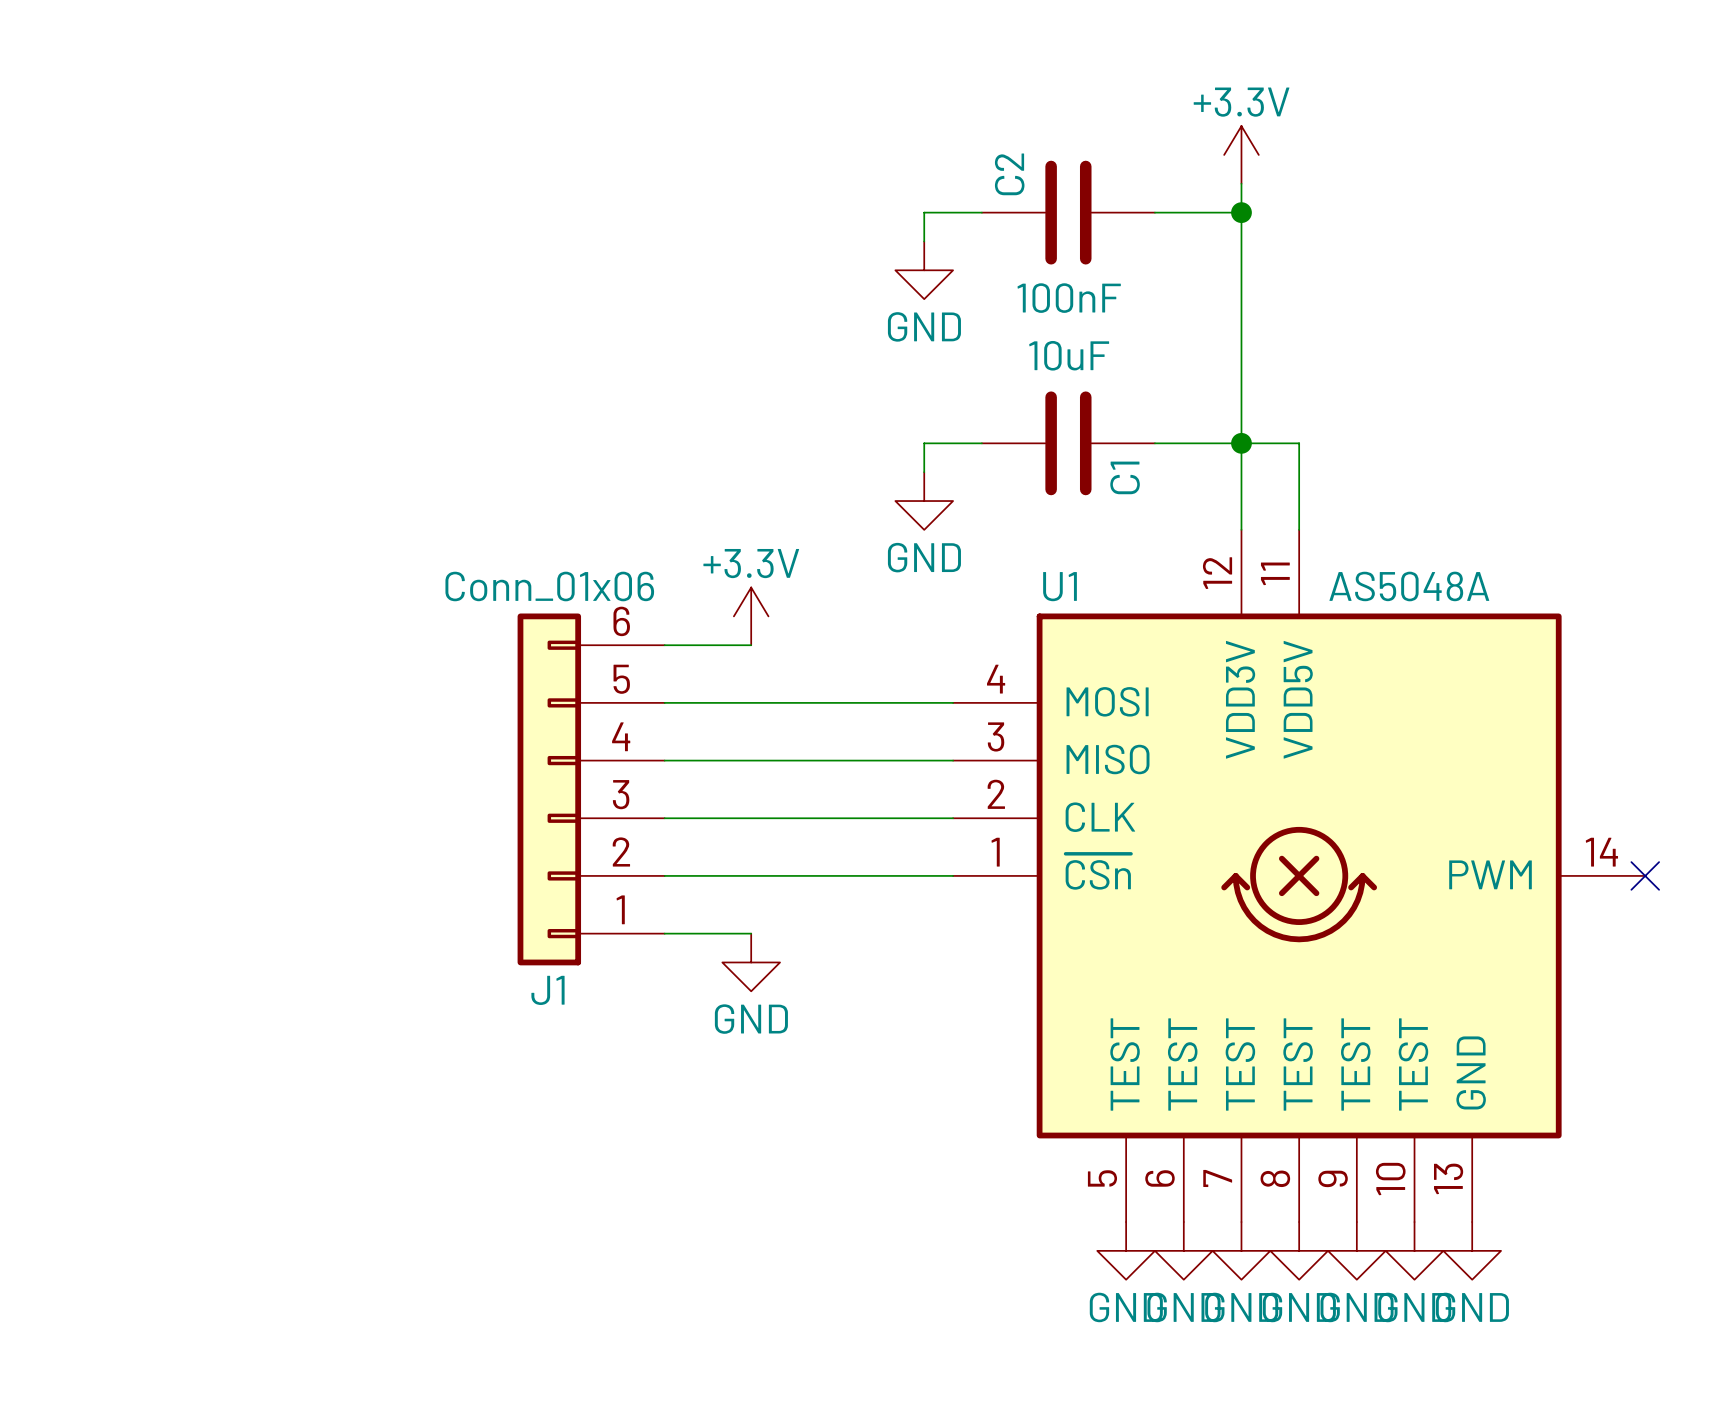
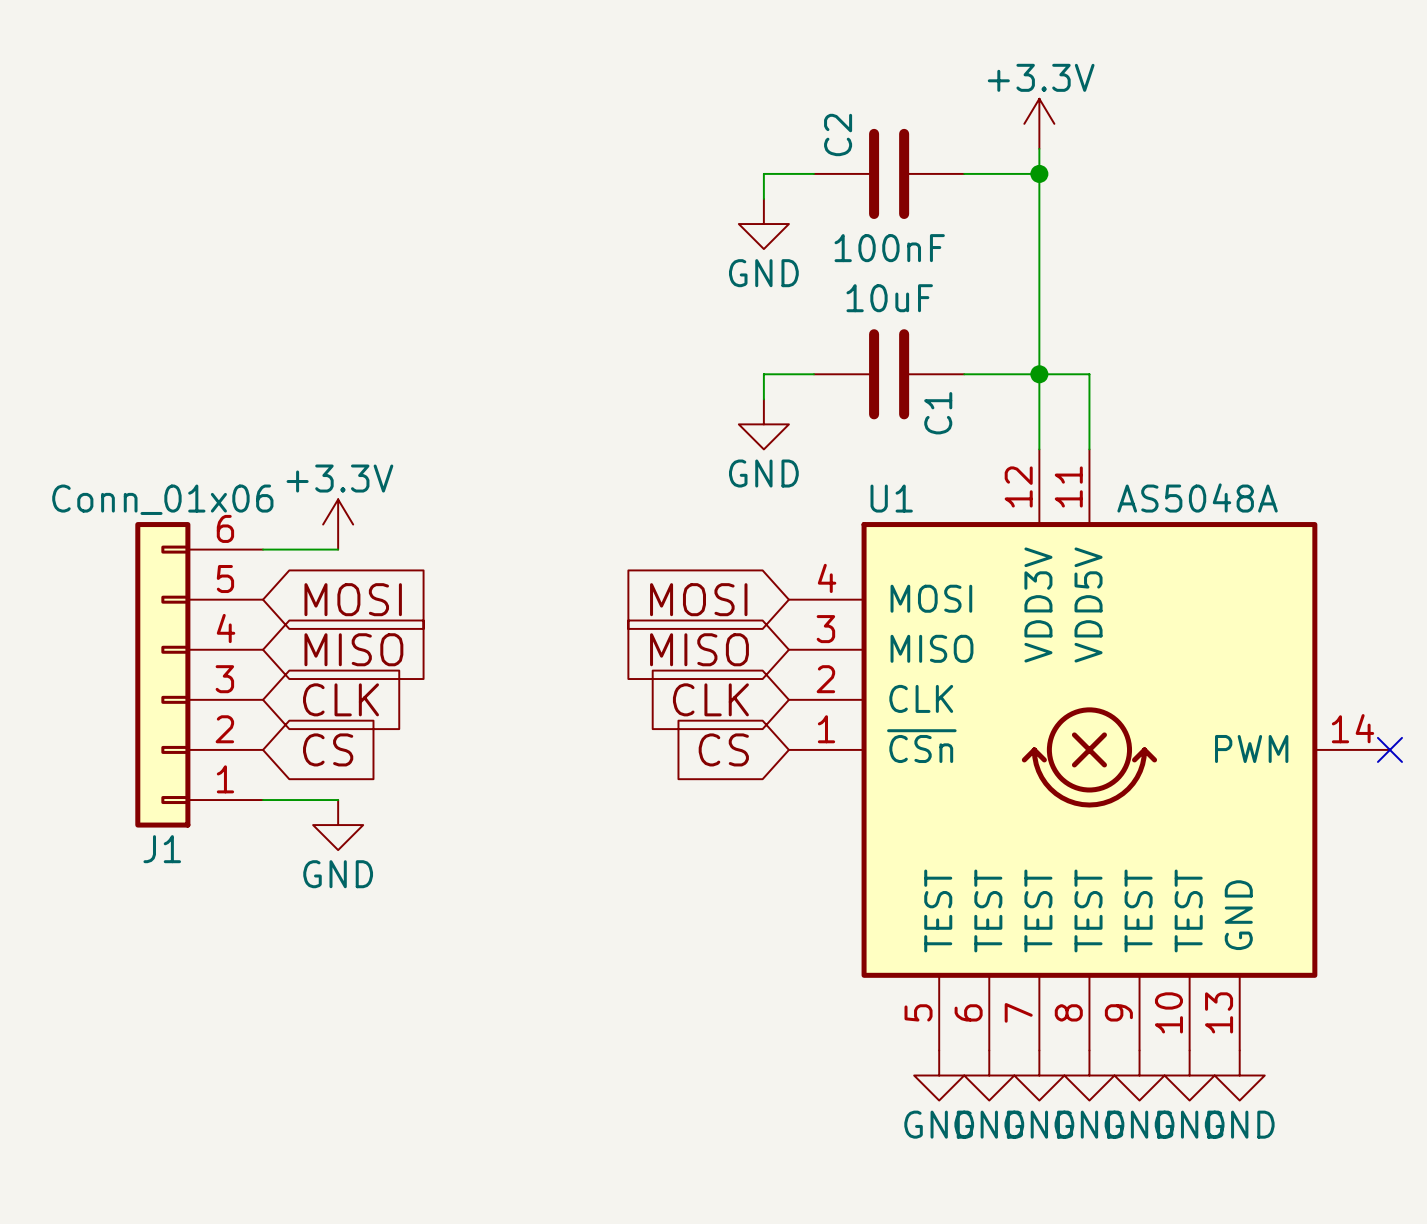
power symbol position: +3.3V (751, 616) -> +3.3V (338, 524)
wire: (664, 645) (751, 645) -> (263, 549) (338, 549)
global label: none -> MOSI (353, 599)
wire: (664, 702) (953, 702) -> none
global label: none -> MOSI (698, 599)
global label: none -> MISO (353, 649)
wire: (664, 760) (953, 760) -> none
global label: none -> MISO (699, 649)
J1 position: (591, 789) -> (199, 674)
global label: none -> CLK (341, 699)
wire: (664, 818) (953, 818) -> none
global label: none -> CLK (710, 699)
global label: none -> CS (328, 749)
wire: (664, 875) (953, 875) -> none
global label: none -> CS (723, 749)
wire: (664, 933) (751, 933) -> (263, 800) (338, 800)
power symbol position: GND (751, 962) -> GND (338, 825)

